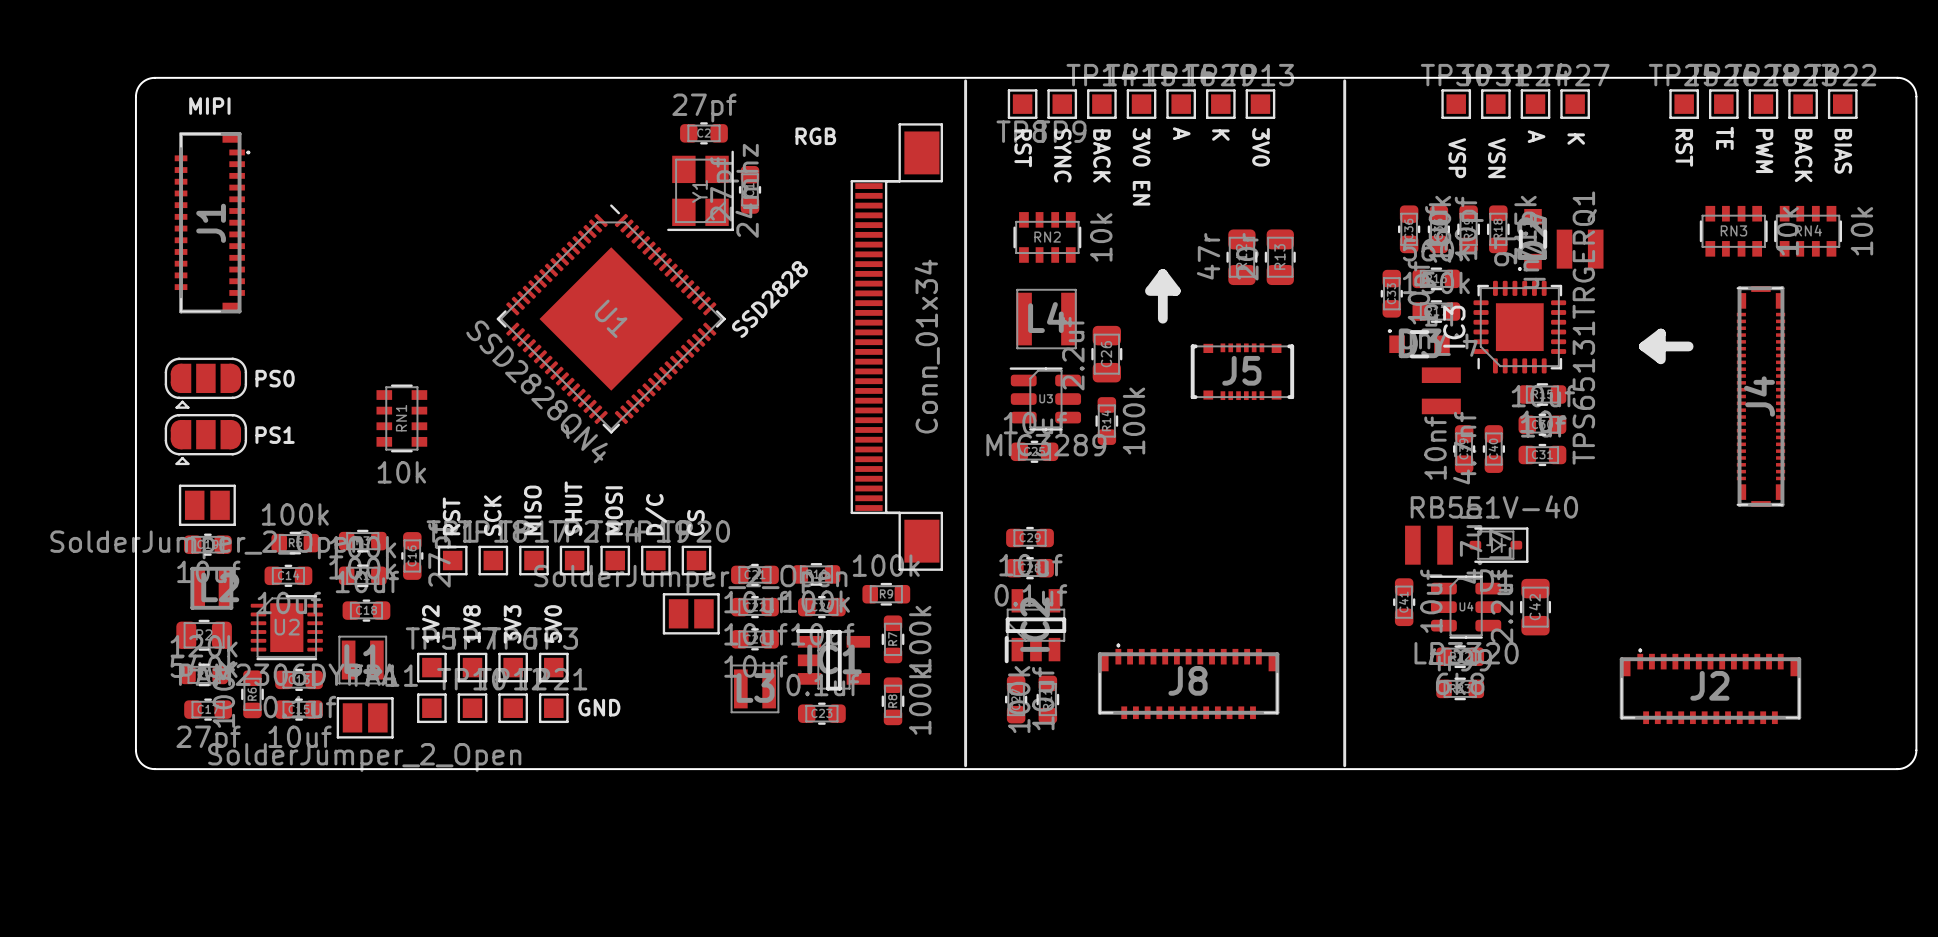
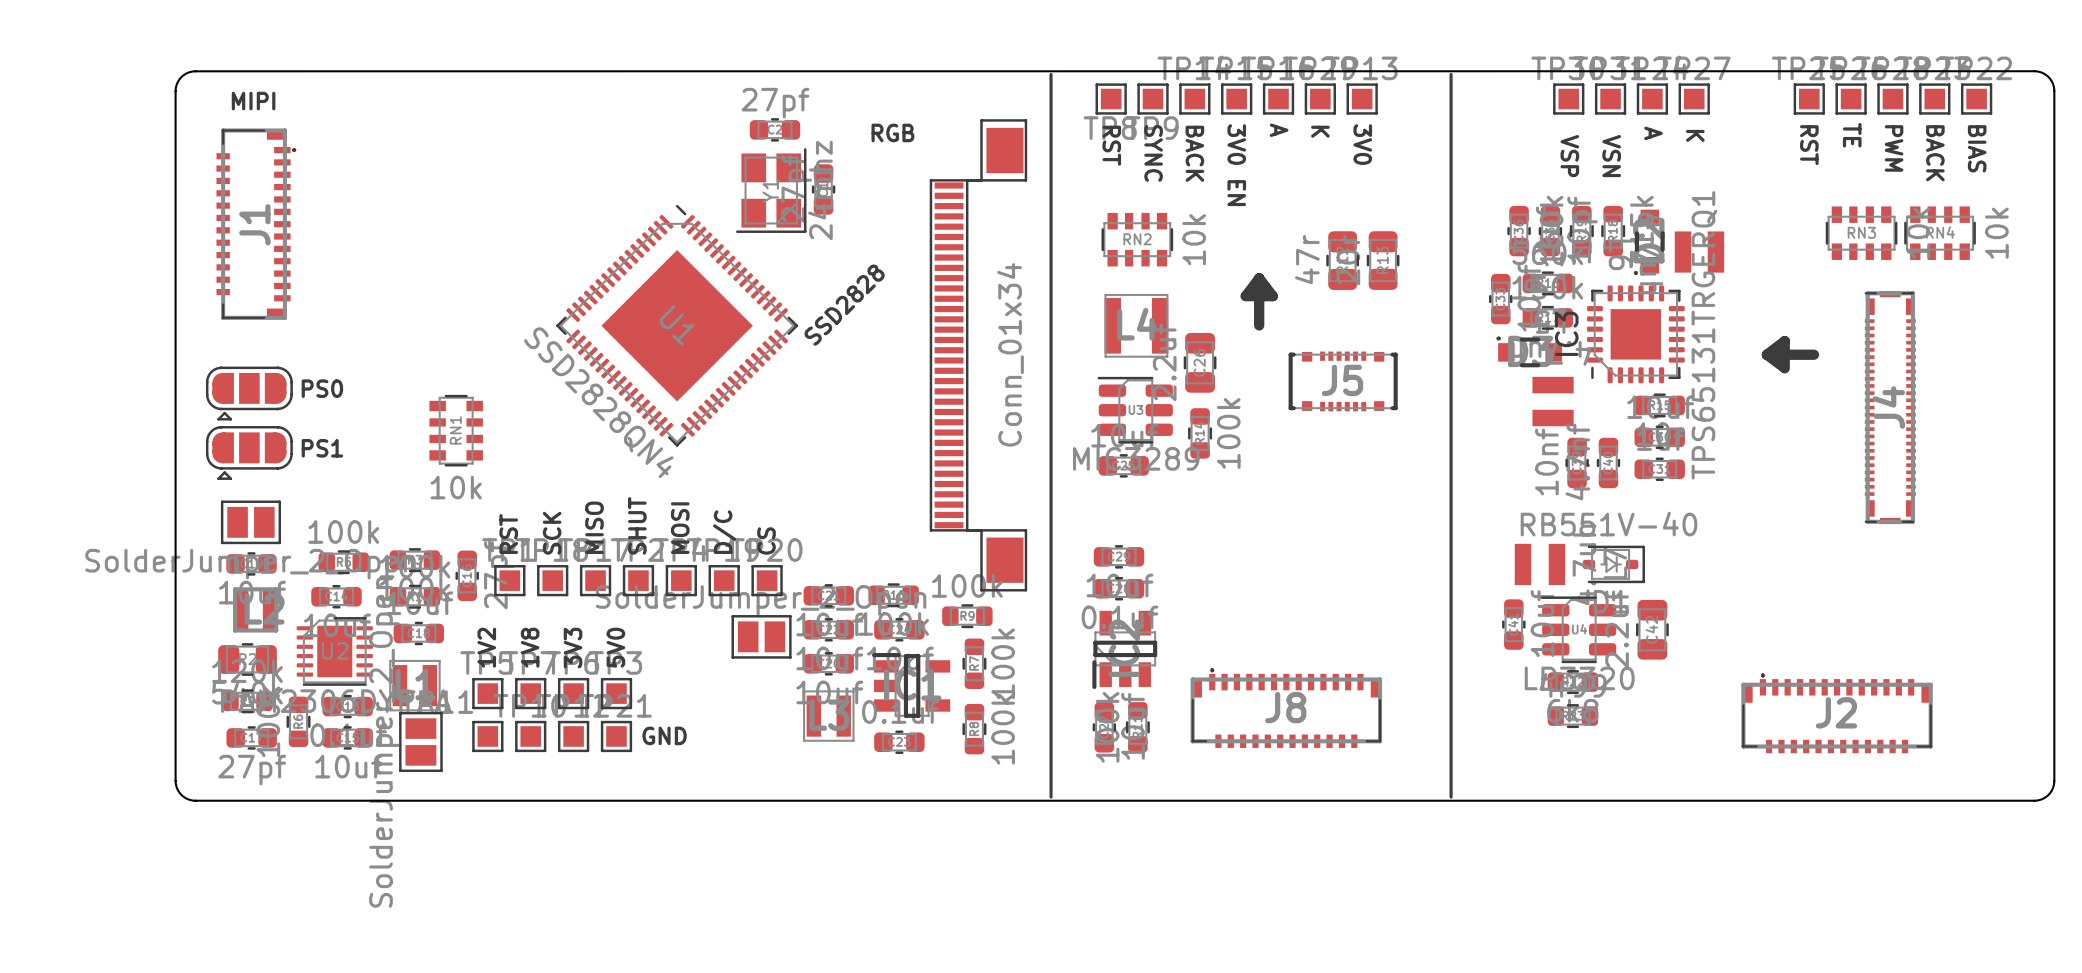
part rotation: 0° (365, 717) -> 90° clockwise (420, 741)

